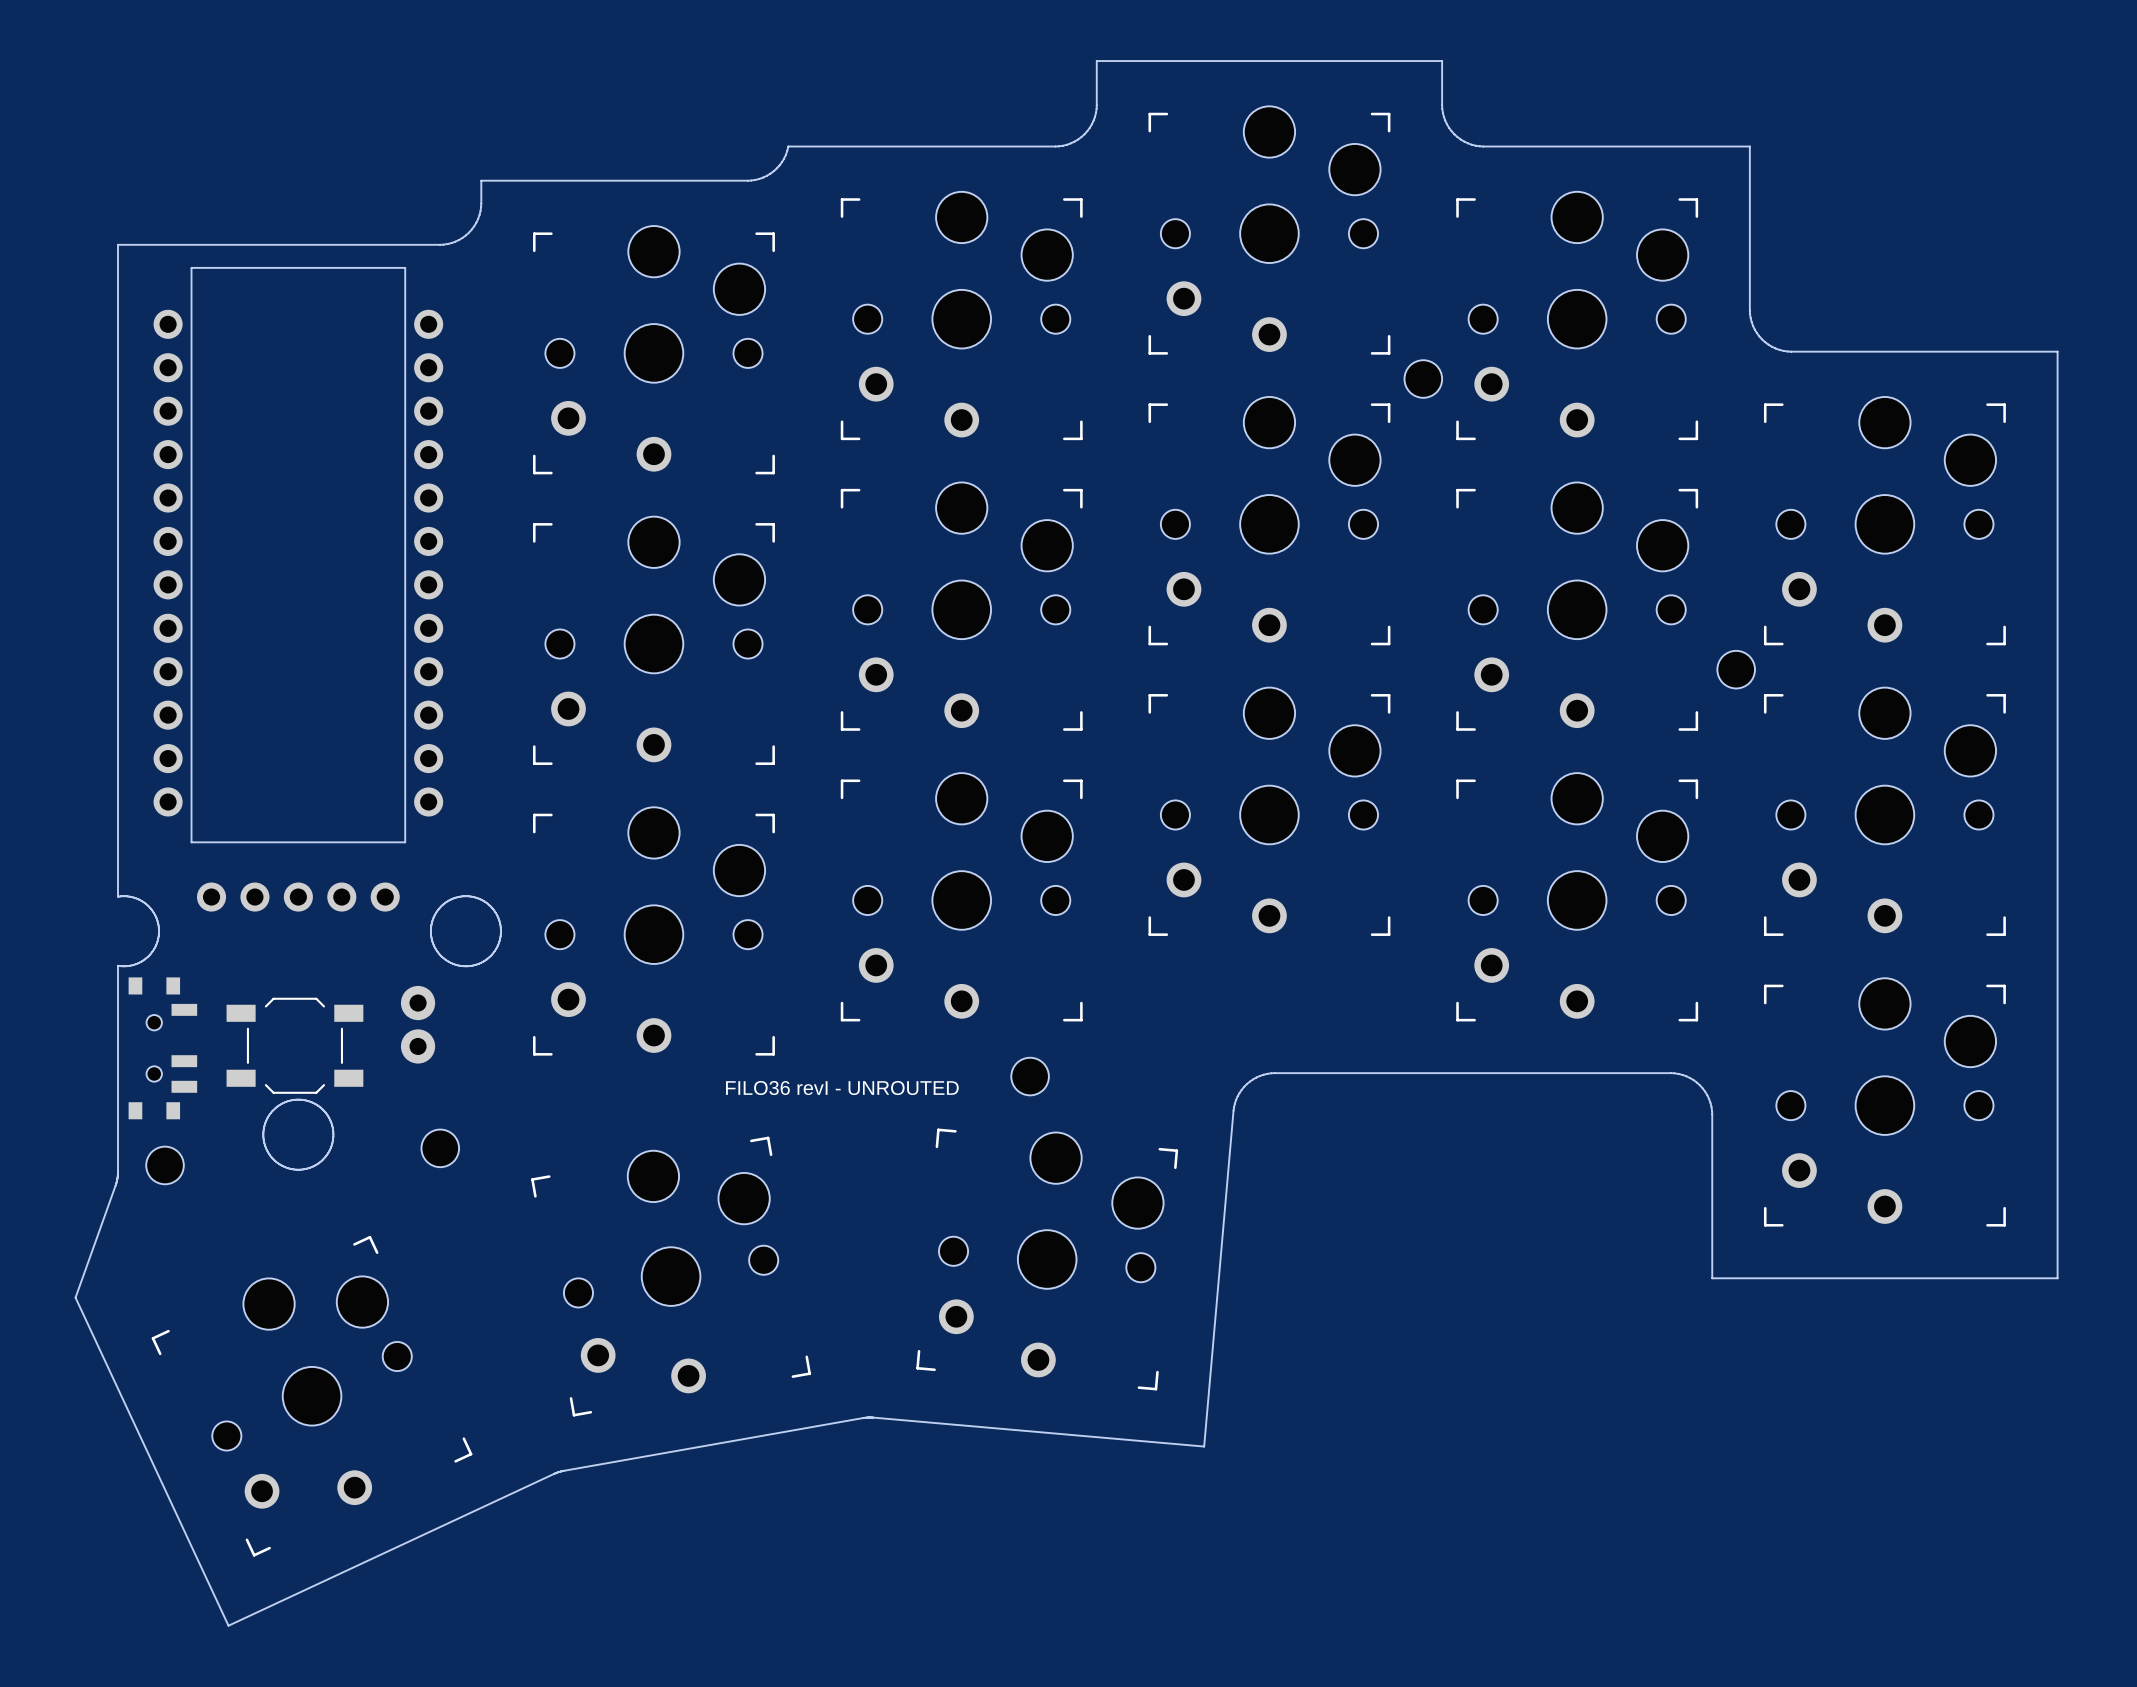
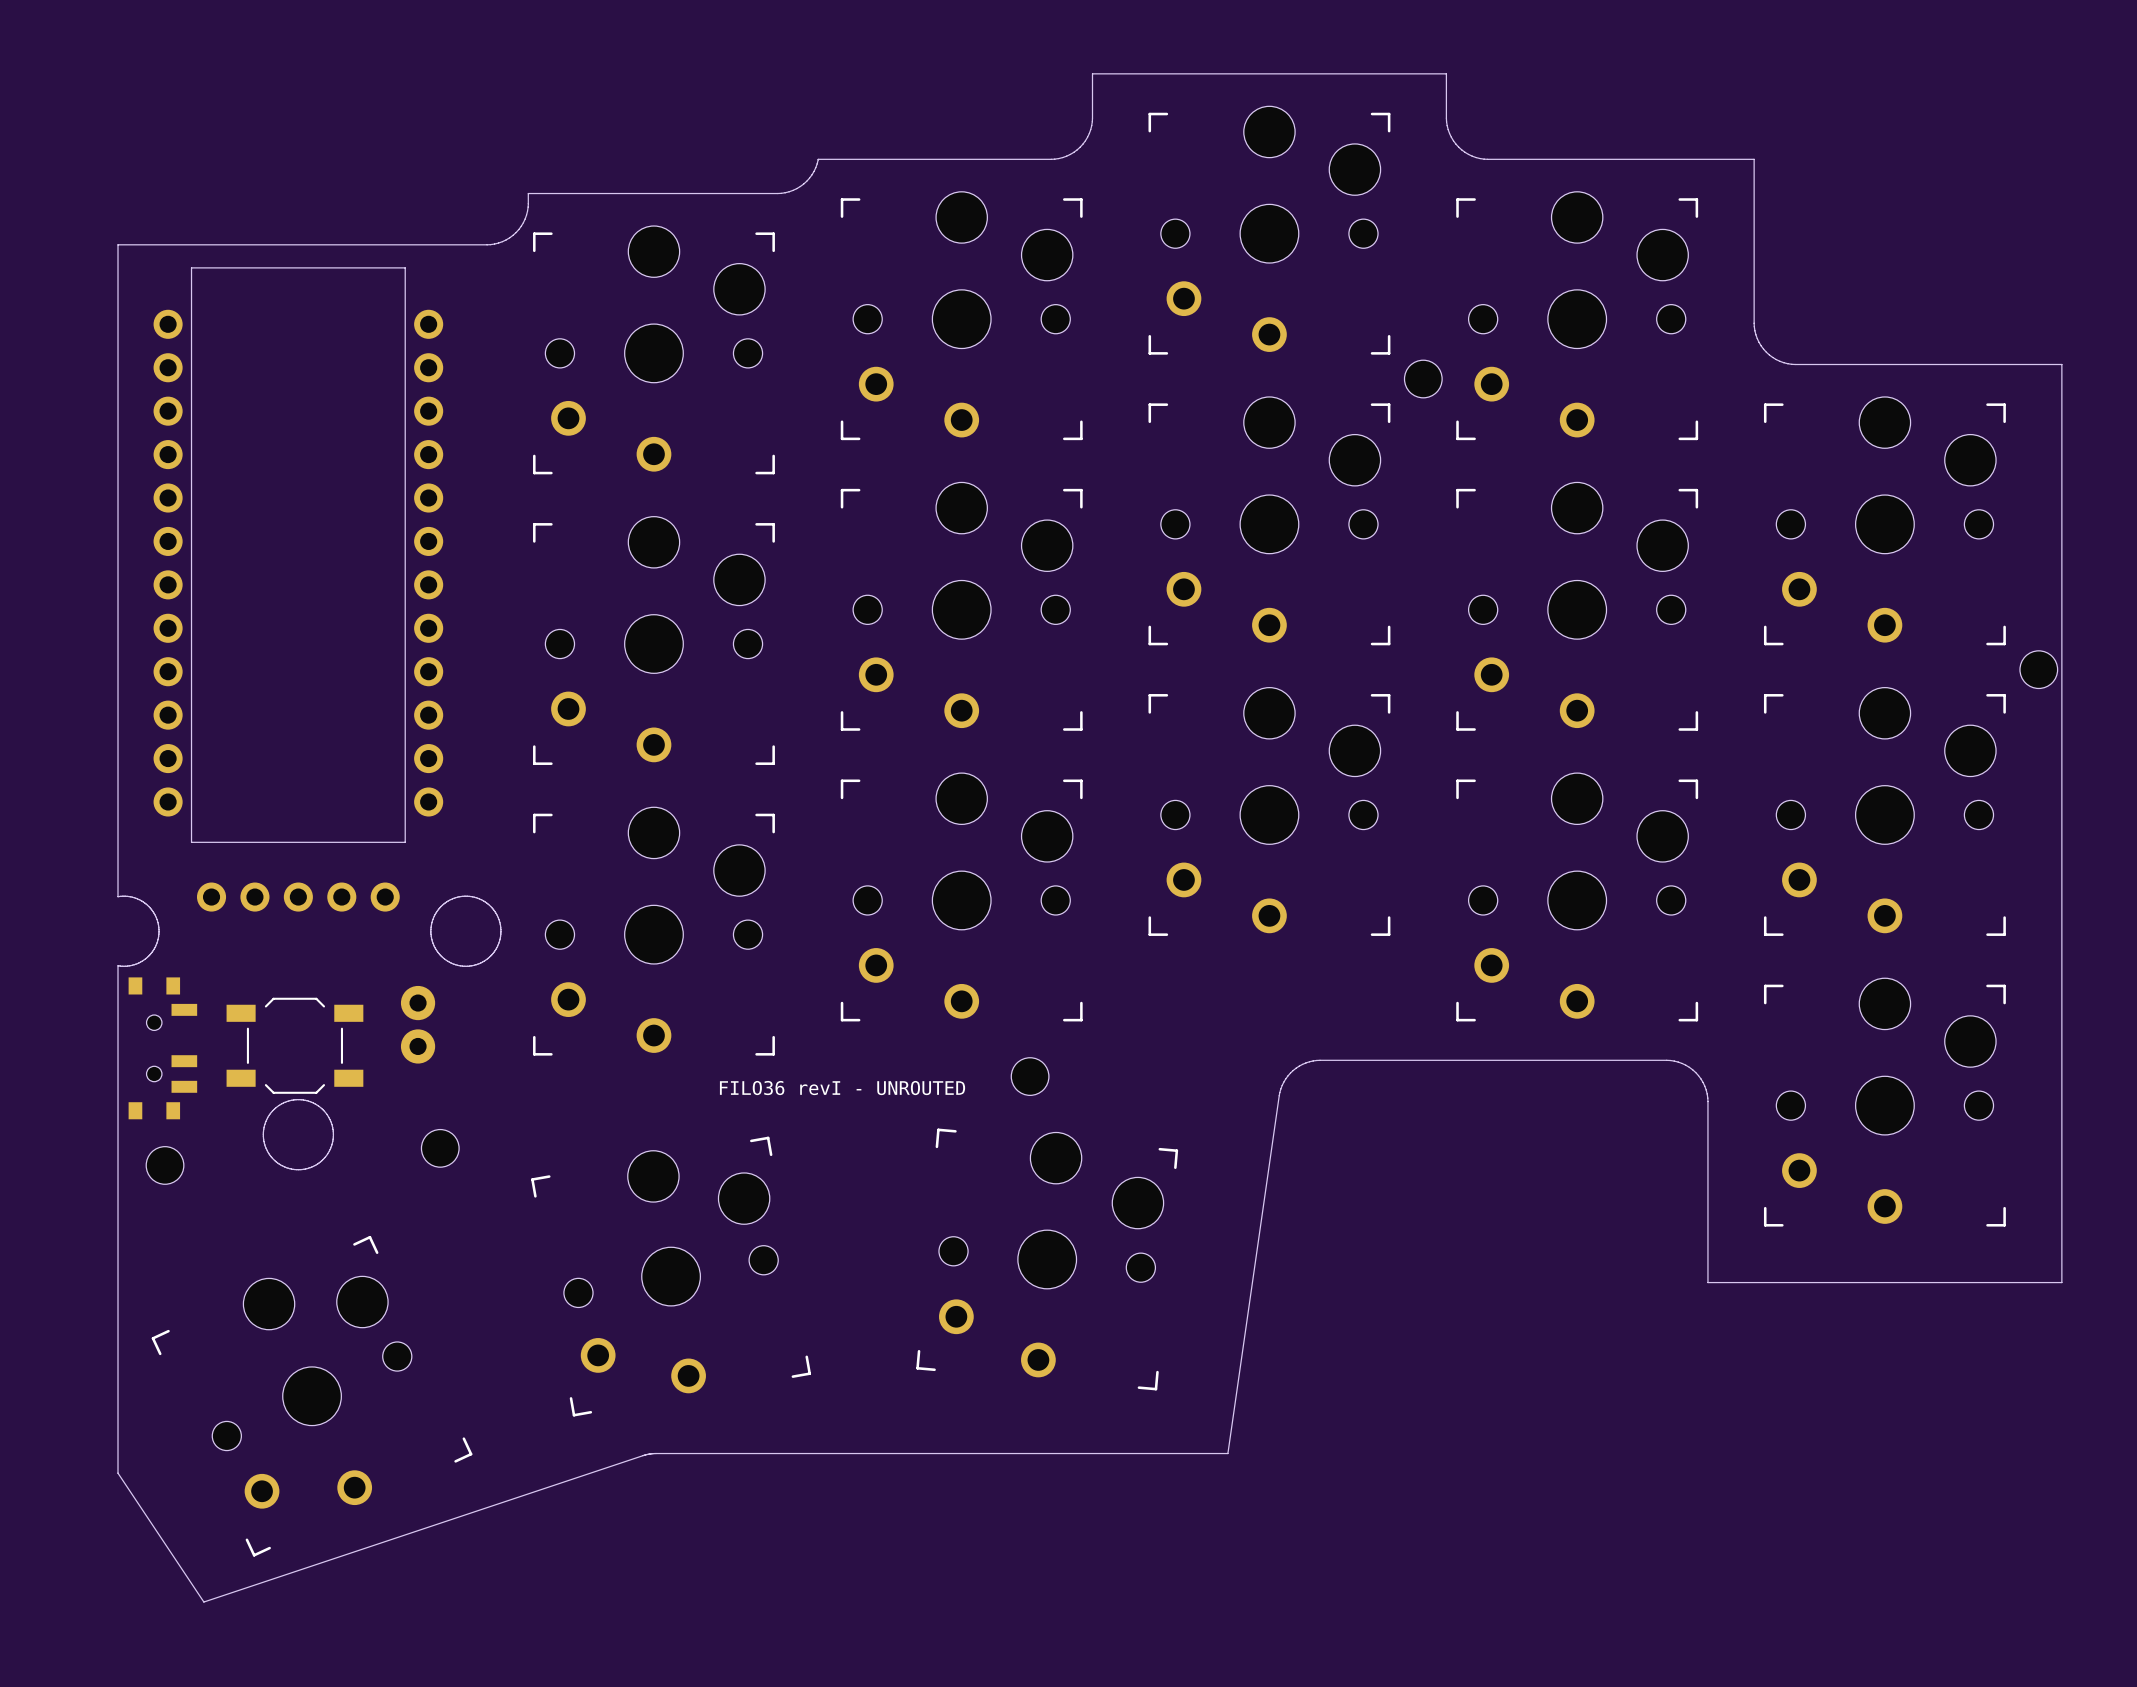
board edge: (440, 244) (459, 239) (474, 226) (480, 211) (481, 180) (751, 180) (766, 175) (776, 168) (784, 158) (788, 146) (1055, 146) (1067, 144) (1084, 134) (1095, 116) (1096, 61) (1442, 61) (1443, 116) (1454, 134) (1471, 144) (1483, 146) (1749, 146) (1750, 313) (1756, 333) (1768, 344) (1779, 349) (1791, 351) (2057, 351) (2057, 1278) (1712, 1278) (1712, 1110) (1709, 1098) (1702, 1088) (1693, 1080) (1682, 1074) (1671, 1073) (1267, 1073) (1256, 1077) (1246, 1084) (1237, 1096) (1233, 1107) (1204, 1446) (868, 1417) (564, 1470) (228, 1625) (75, 1297) (115, 1184) (118, 1171) -> (440, 244) (490, 244) (506, 239) (516, 232) (523, 222) (527, 211) (528, 193) (781, 193) (796, 188) (806, 181) (814, 171) (818, 159) (1051, 159) (1062, 157) (1080, 147) (1090, 129) (1092, 73) (1446, 73) (1448, 129) (1458, 147) (1476, 157) (1487, 159) (1754, 159) (1754, 326) (1761, 345) (1772, 357) (1783, 362) (1795, 364) (2061, 364) (2061, 1282) (1707, 1282) (1707, 1098) (1704, 1086) (1698, 1075) (1689, 1067) (1678, 1062) (1666, 1060) (1313, 1060) (1299, 1066) (1290, 1073) (1279, 1092) (1227, 1453) (650, 1453) (203, 1602) (118, 1473) (118, 1171)
part position: (1736, 669) -> (2038, 669)

